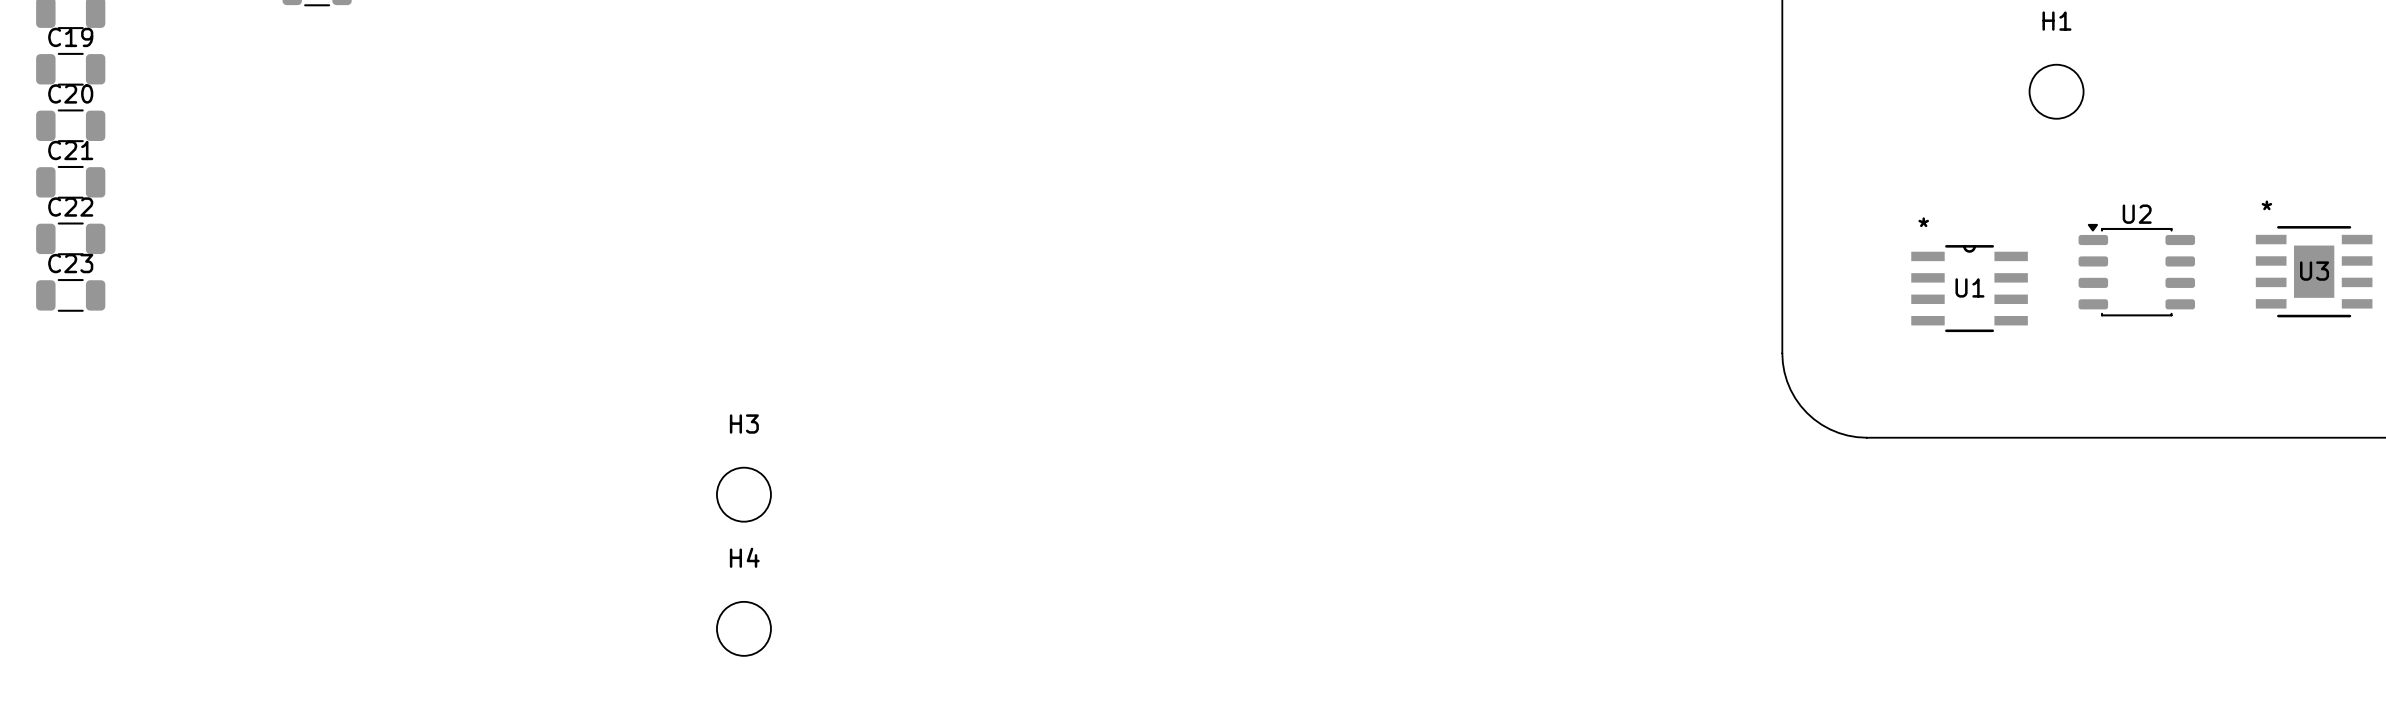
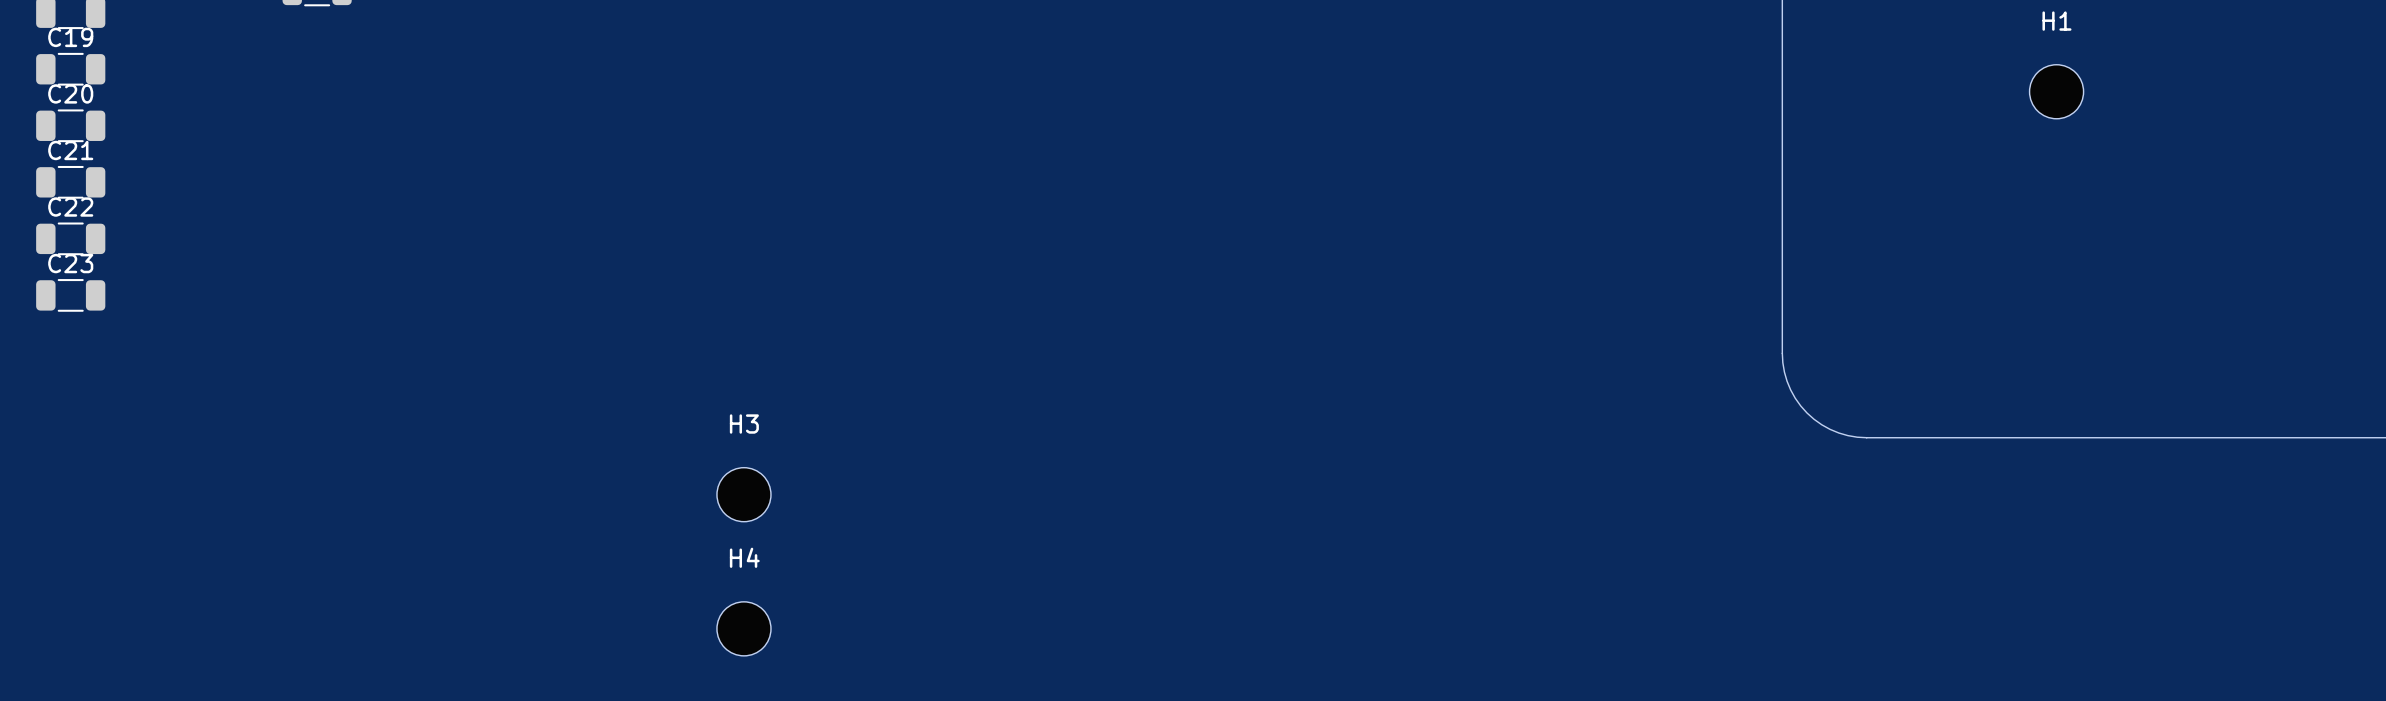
U2: (2136, 270) -> none
U3: (2314, 271) -> none
U1: (1969, 288) -> none

